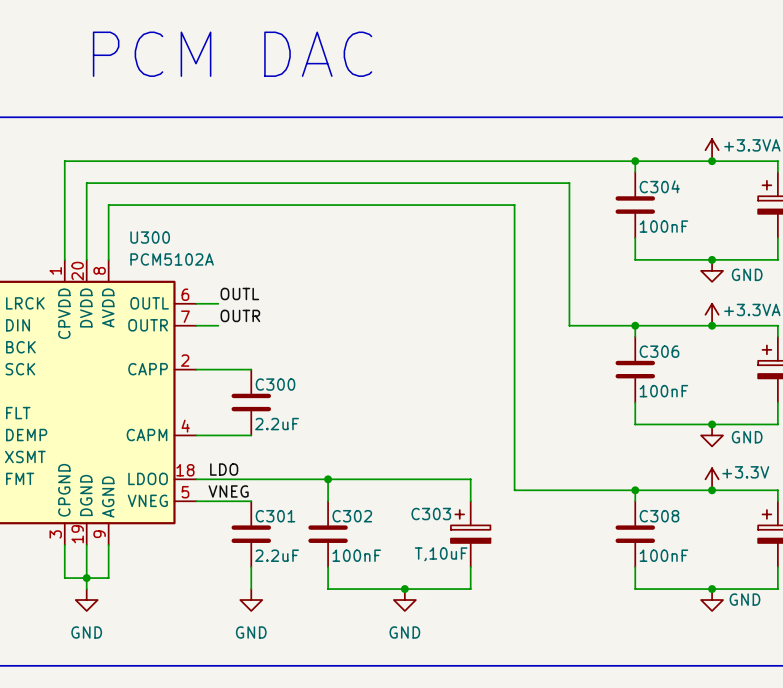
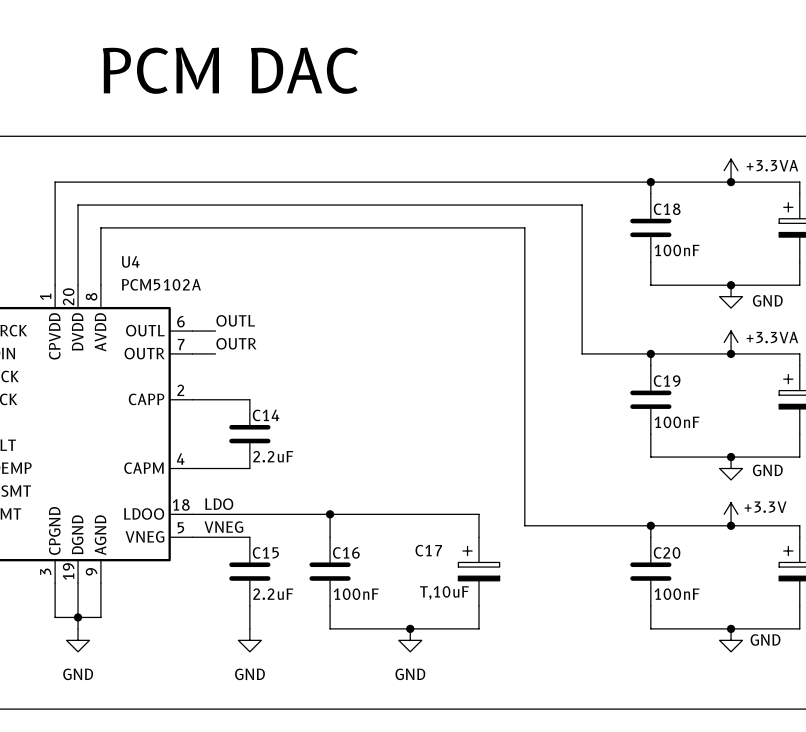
C304 name: C304 (659, 186) -> C18 (667, 209)
U300 name: U300 (150, 237) -> U4 (130, 261)
C306 name: C306 (659, 351) -> C19 (667, 381)
C300 name: C300 (275, 384) -> C14 (266, 415)
C303 name: C303 (431, 514) -> C17 (428, 550)
C301 name: C301 (275, 516) -> C15 (265, 552)
C302 name: C302 (352, 516) -> C16 (346, 552)
C308 name: C308 (659, 516) -> C20 (667, 552)

